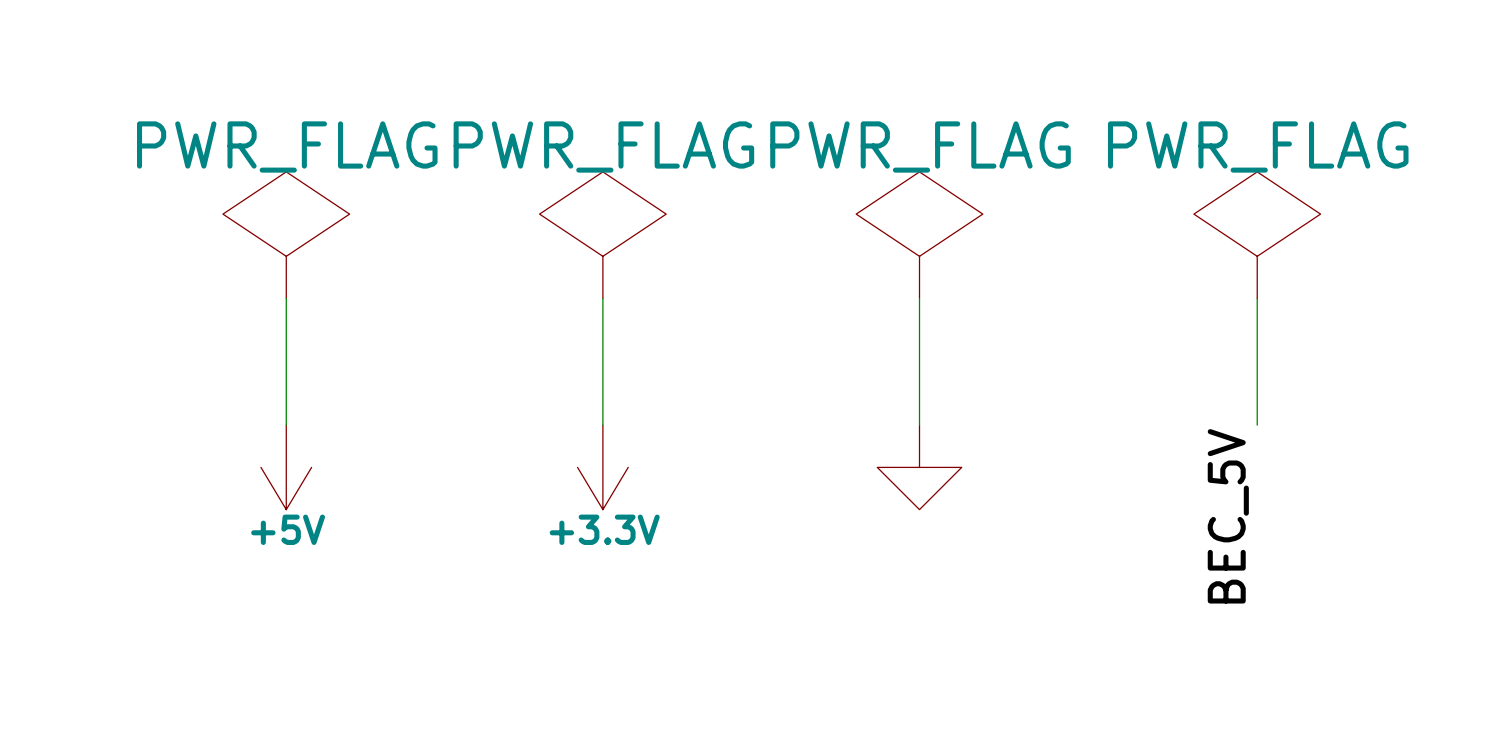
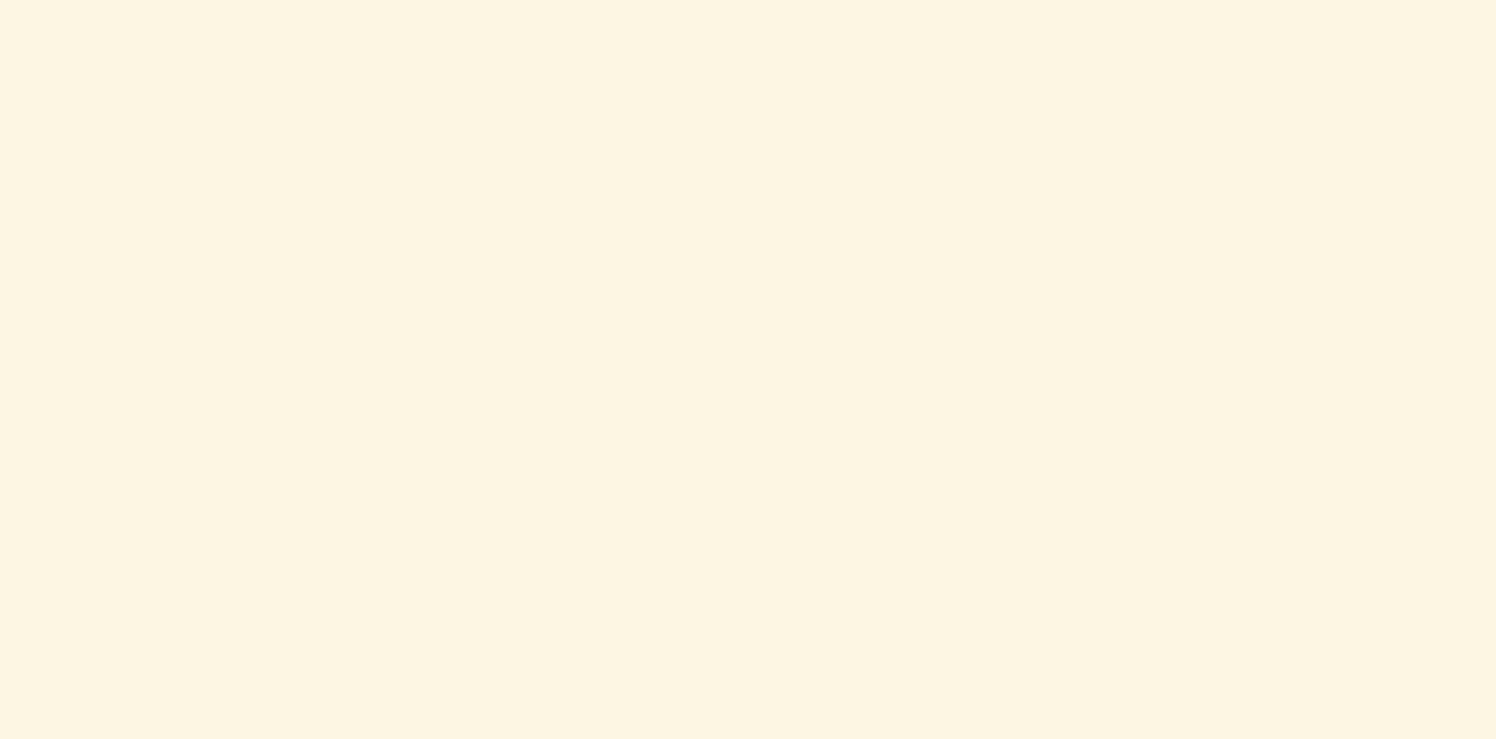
power symbol: PWR_FLAG (286, 235) -> none
power symbol: PWR_FLAG (602, 235) -> none
power symbol: PWR_FLAG (919, 235) -> none
power symbol: PWR_FLAG (1257, 235) -> none
wire: (286, 298) (286, 425) -> none
wire: (602, 298) (602, 425) -> none
wire: (919, 298) (919, 425) -> none
wire: (1257, 298) (1257, 425) -> none
power symbol: +5V (286, 467) -> none
power symbol: +3.3V (602, 467) -> none
power symbol: (919, 467) -> none
label: BEC_5V (1228, 516) -> none

